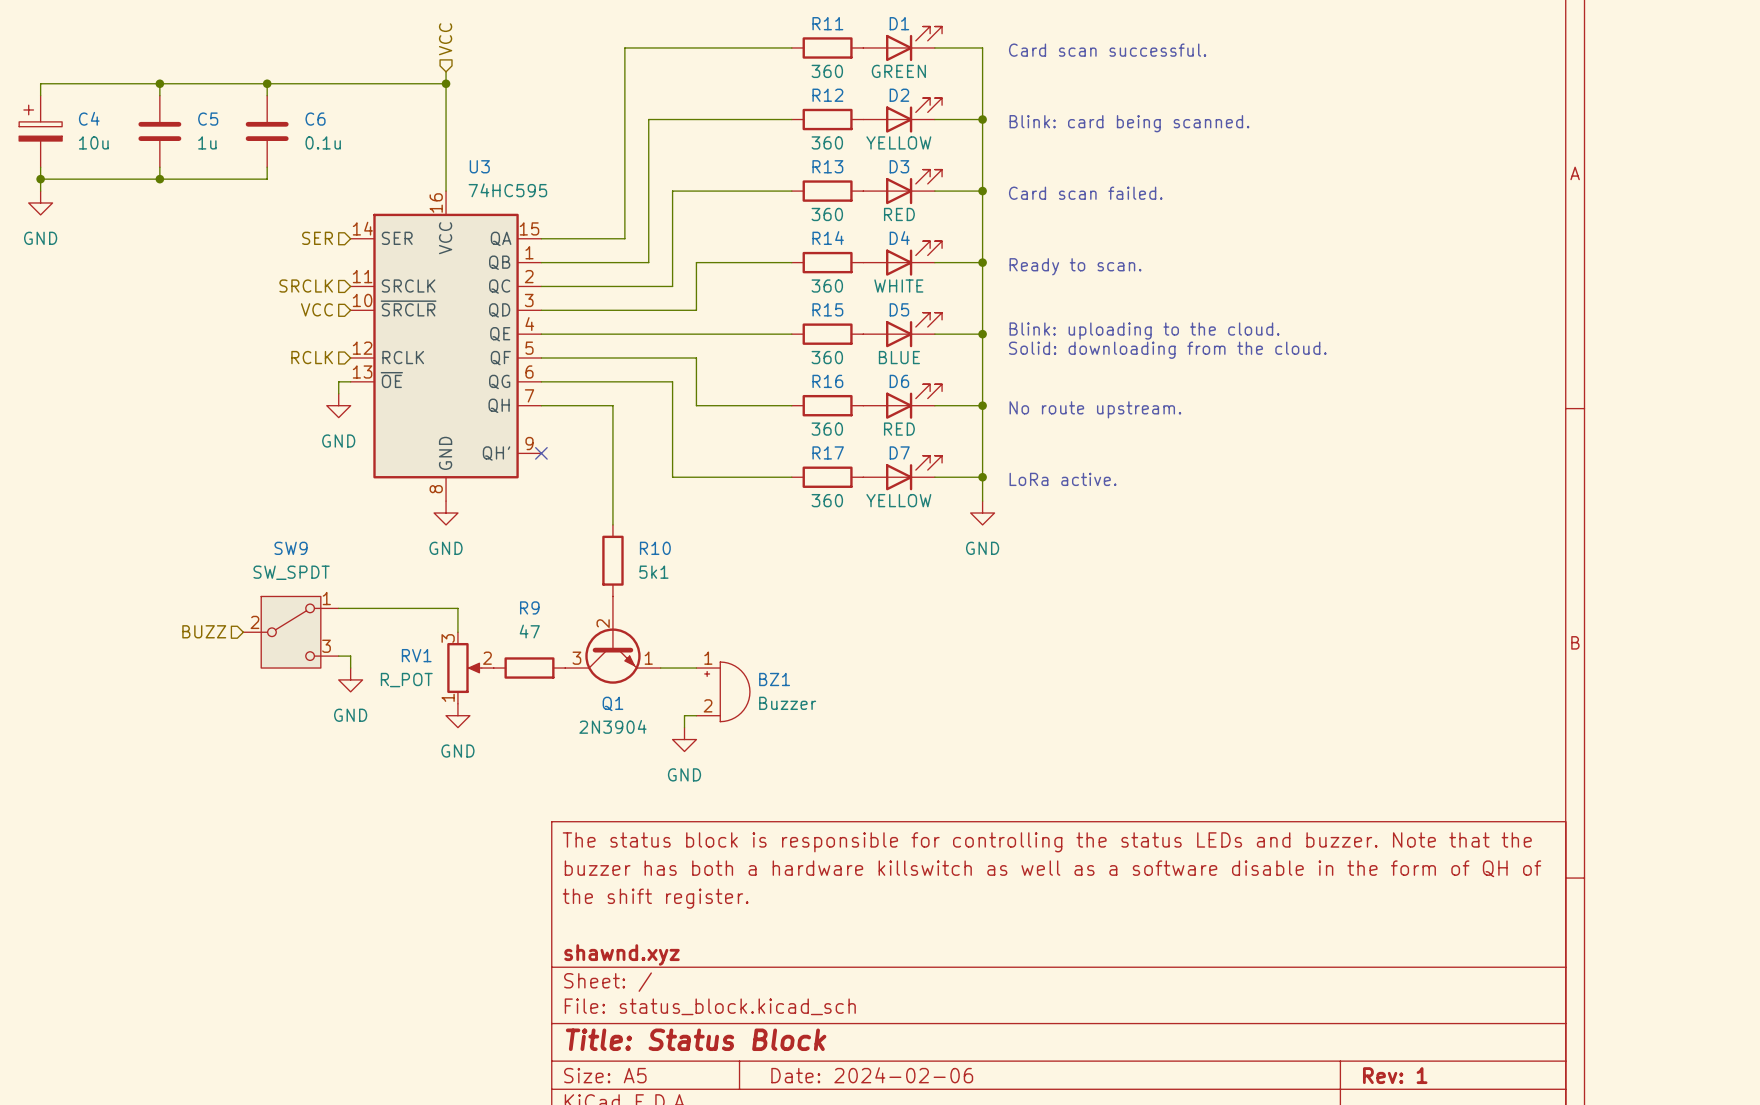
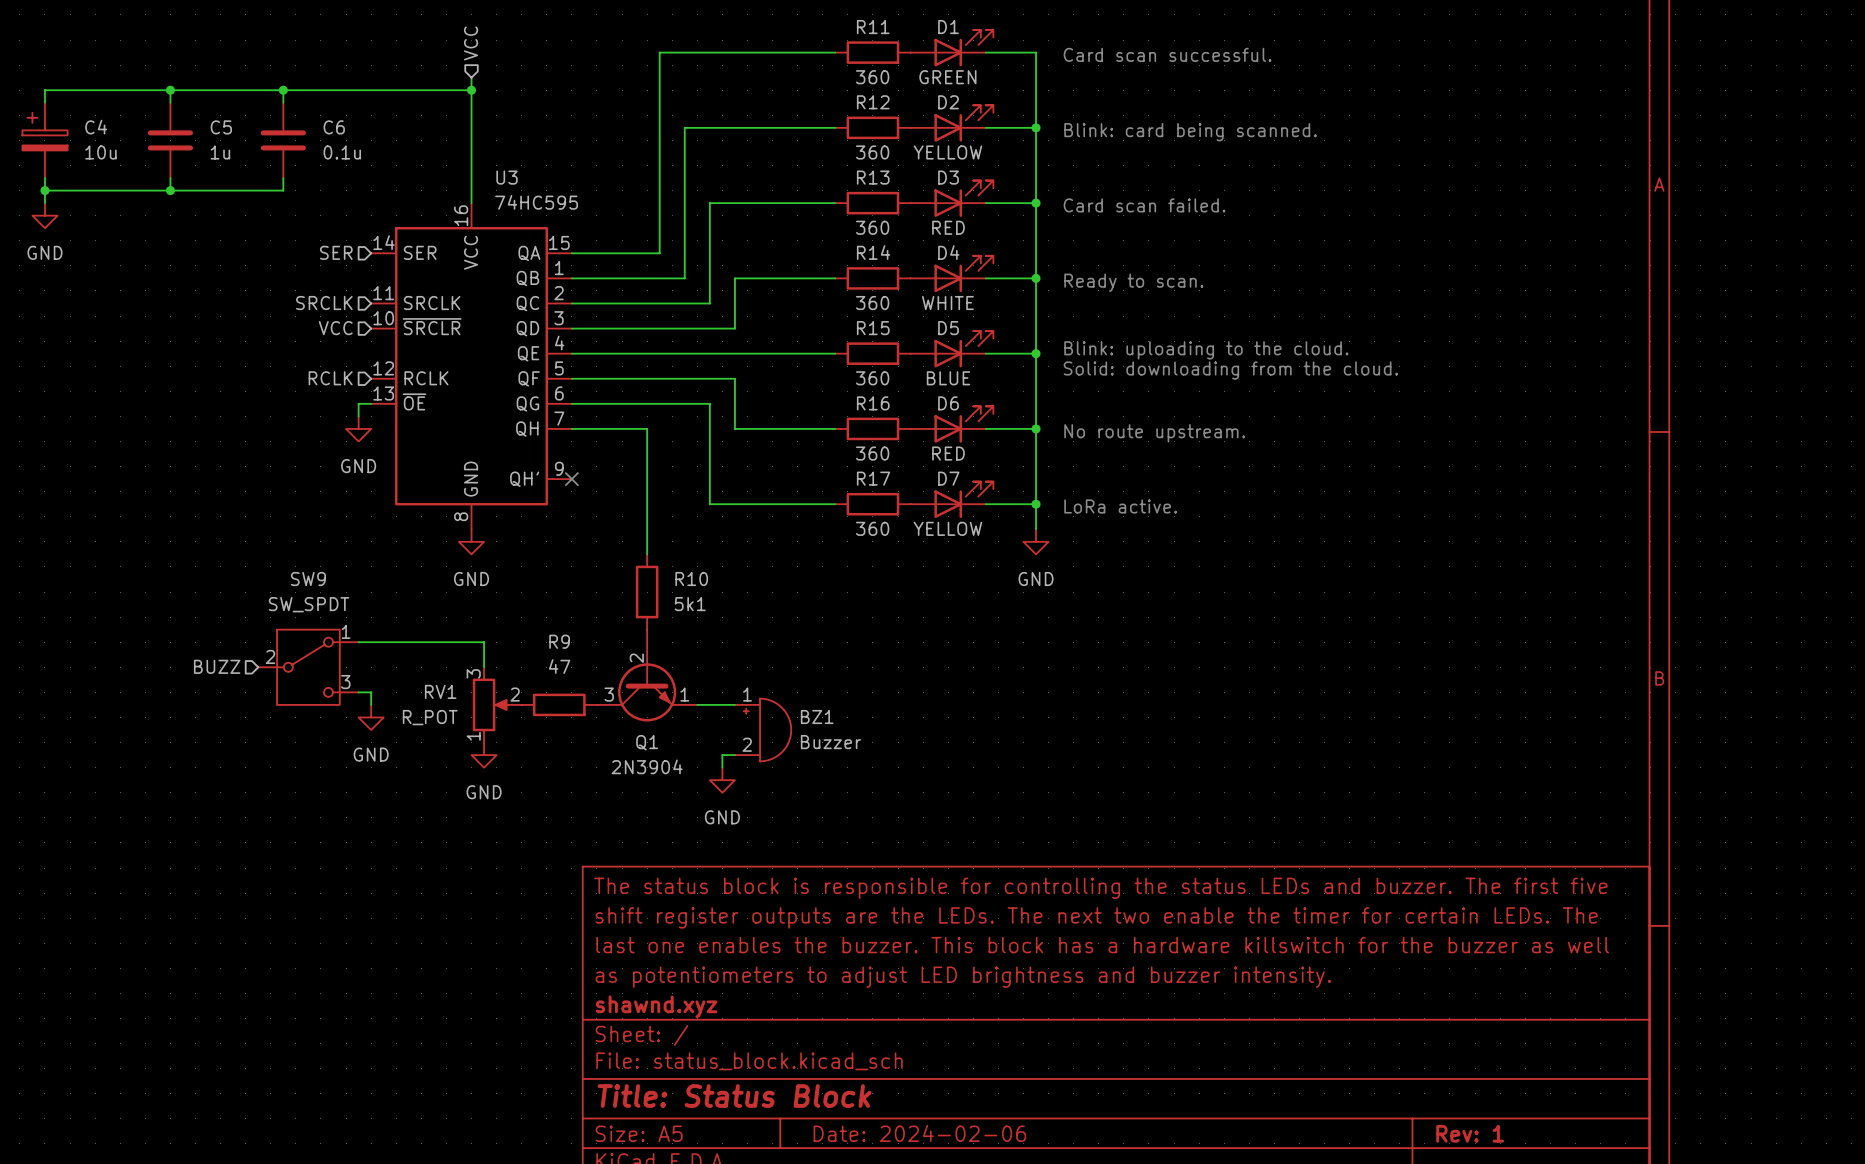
title block: The status block is responsible for controlling the status LEDs and buzzer. Note that the (1047, 842) -> The status block is responsible for controlling the status LEDs and buzzer. The first five (1100, 888)
title block: buzzer has both a hardware killswitch as well as a software disable in the form of QH of (1052, 868) -> shift register outputs are the LEDs. The next two enable the timer for certain LEDs. The (1096, 917)
title block: the shift register. (655, 898) -> last one enables the buzzer. This block has a hardware killswitch for the buzzer as well (1102, 945)
title block: none -> as potentiometers to adjust LED brightness and buzzer intensity. (963, 977)

